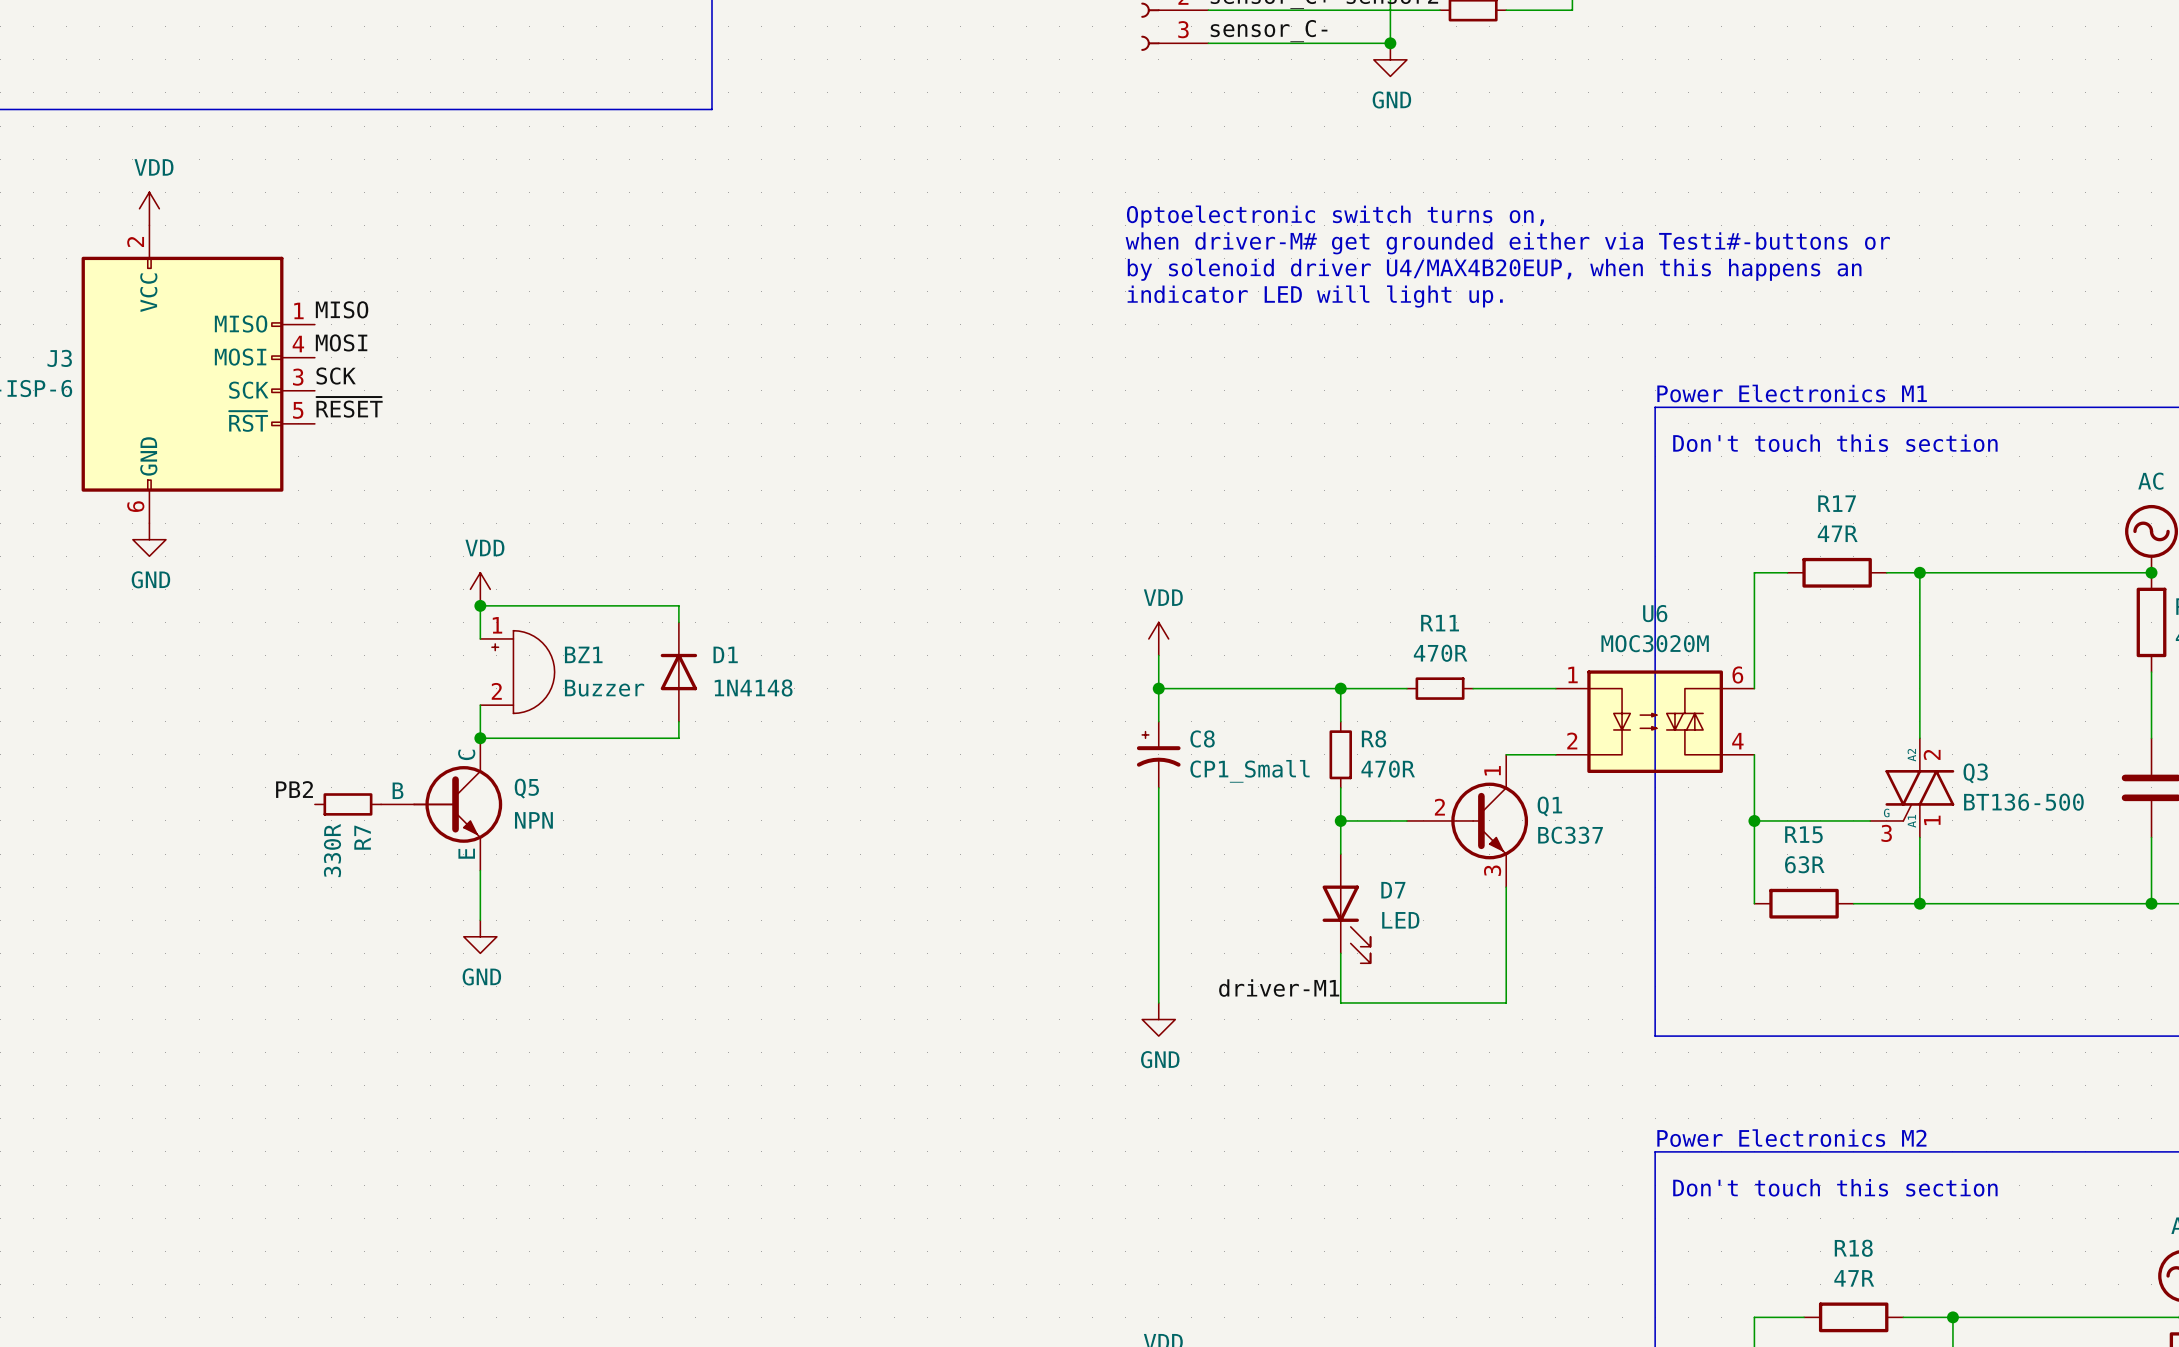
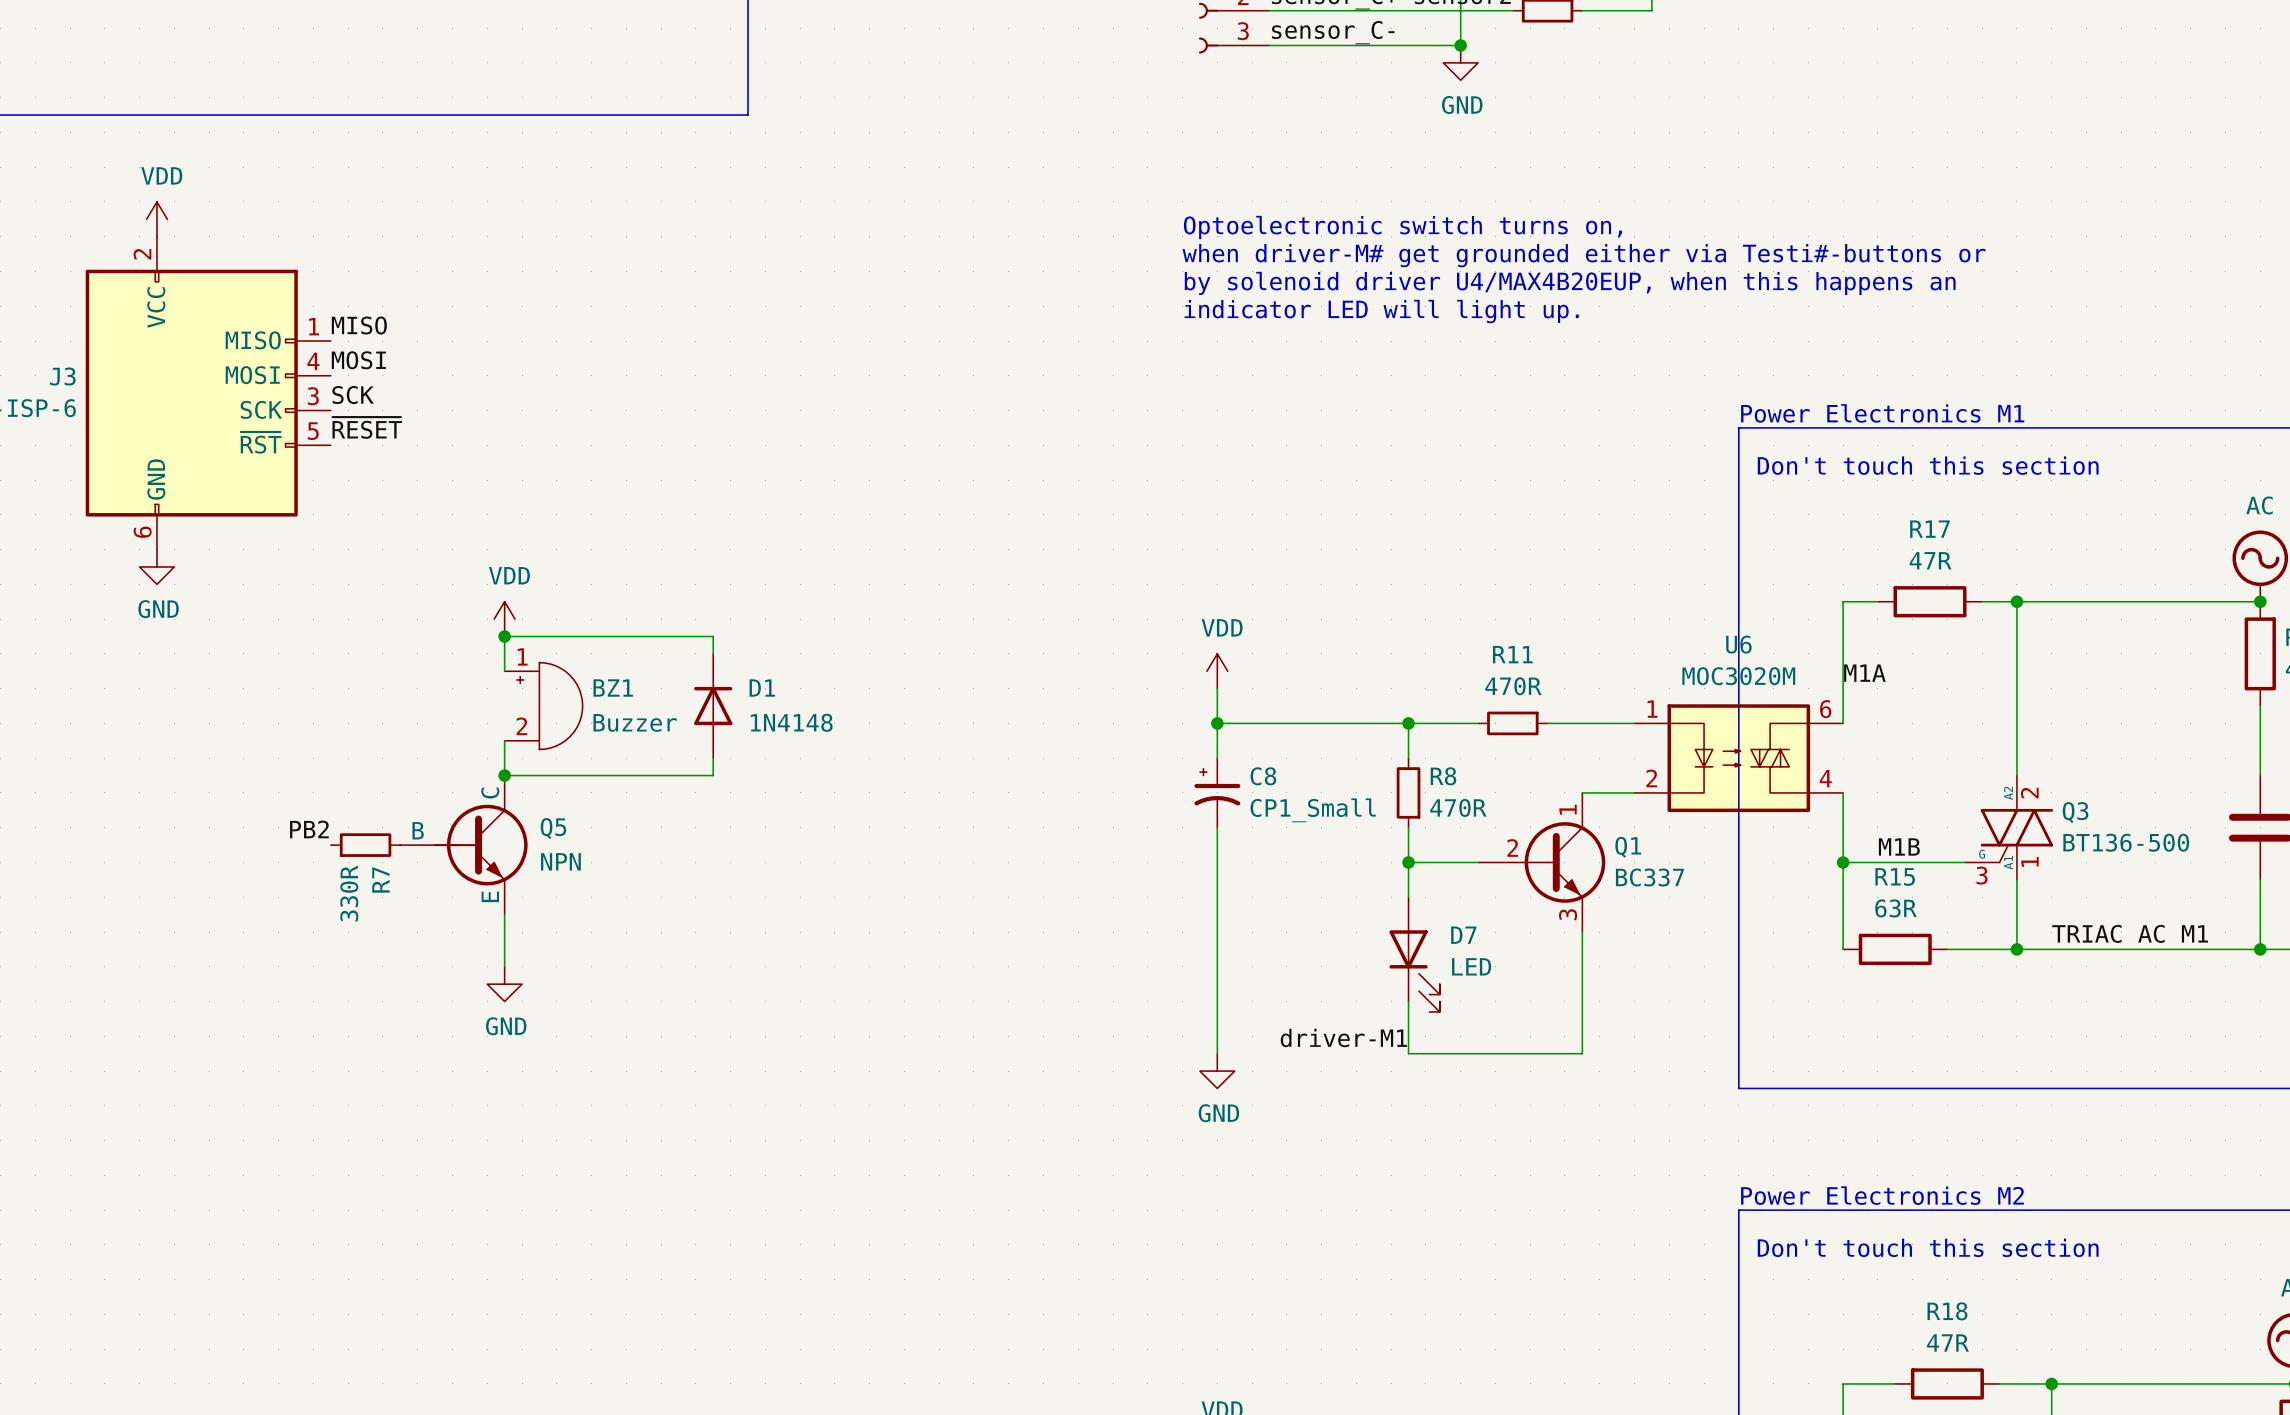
label: none -> M1A (1864, 673)
label: none -> M1B (1899, 846)
label: none -> TRIAC AC M1 (2130, 933)

